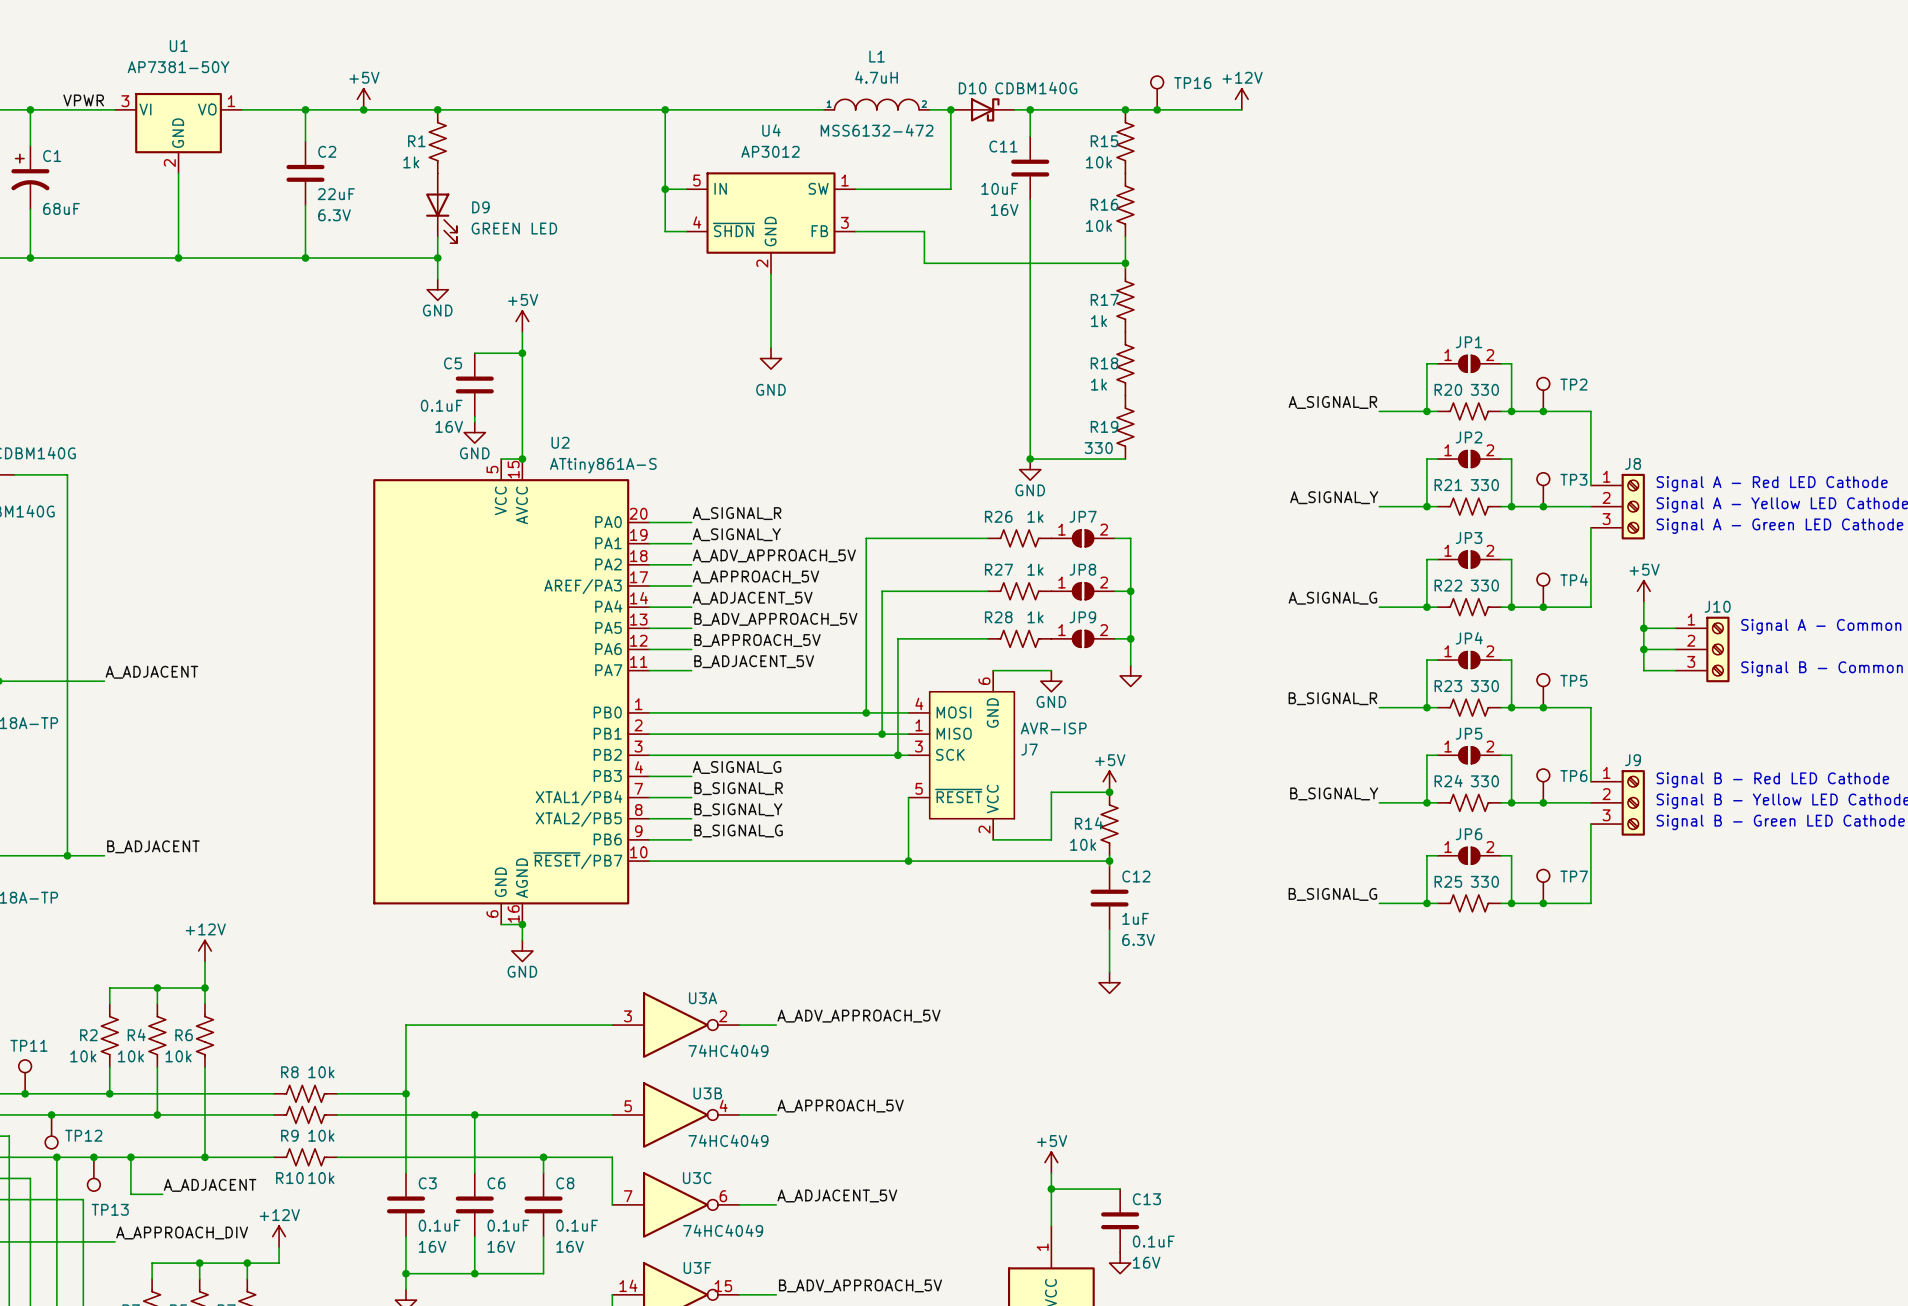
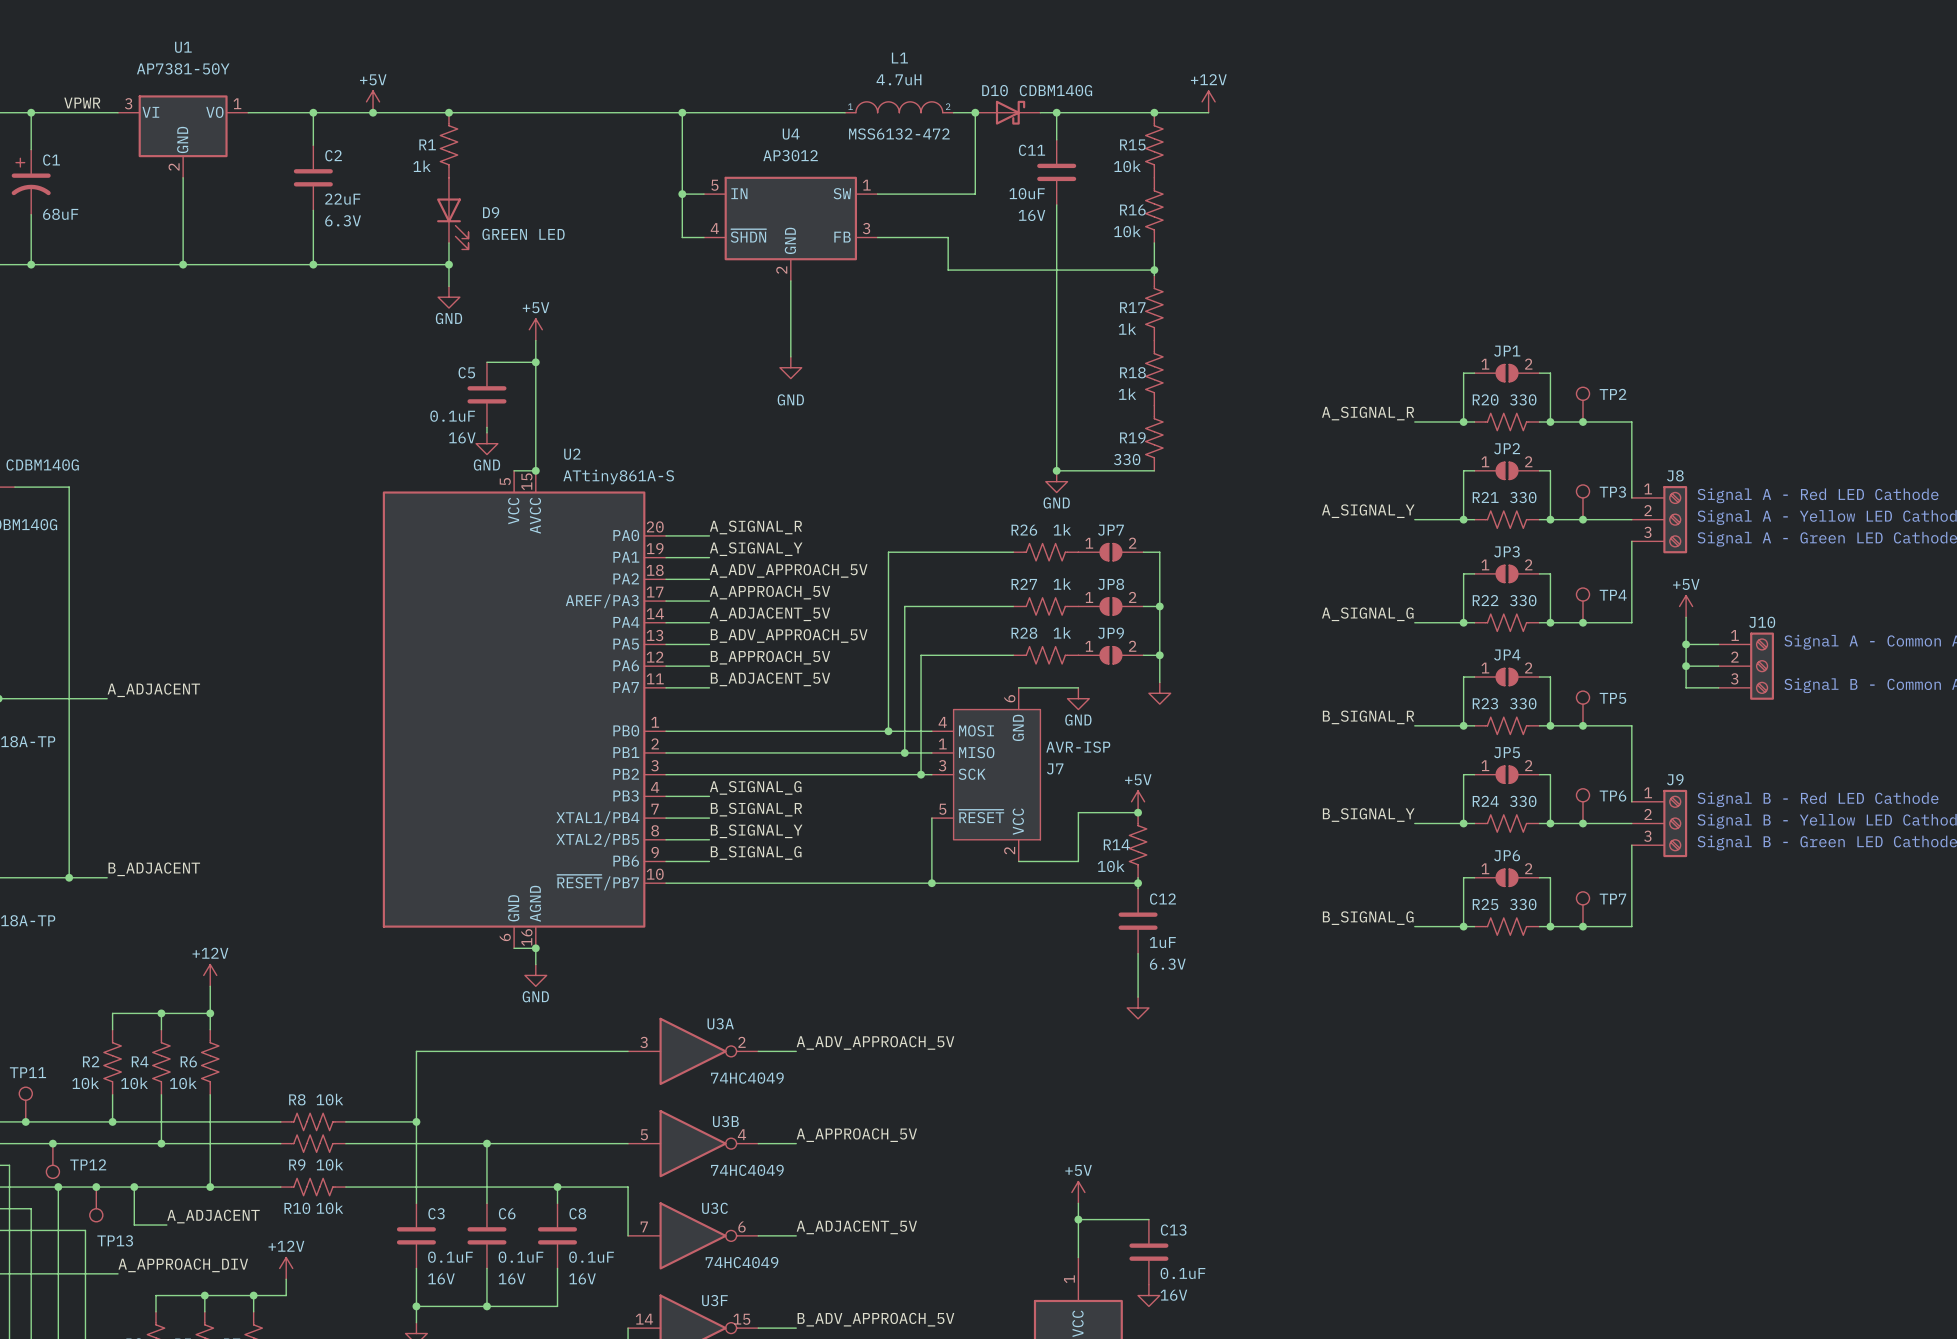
TP16: (1157, 92) -> none
power symbol position: +12V (1241, 99) -> +12V (1208, 101)
junction: (1157, 109) -> none
wire: (1178, 109) (1241, 109) -> none

